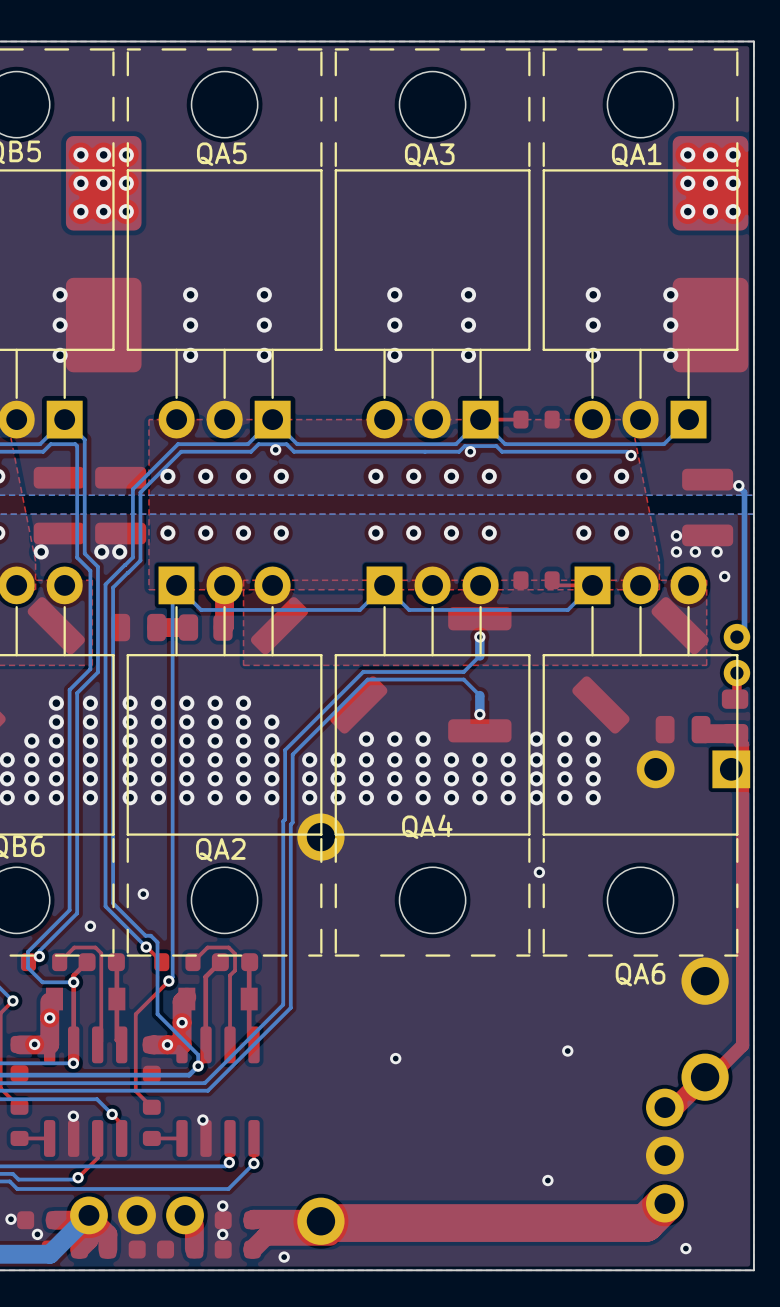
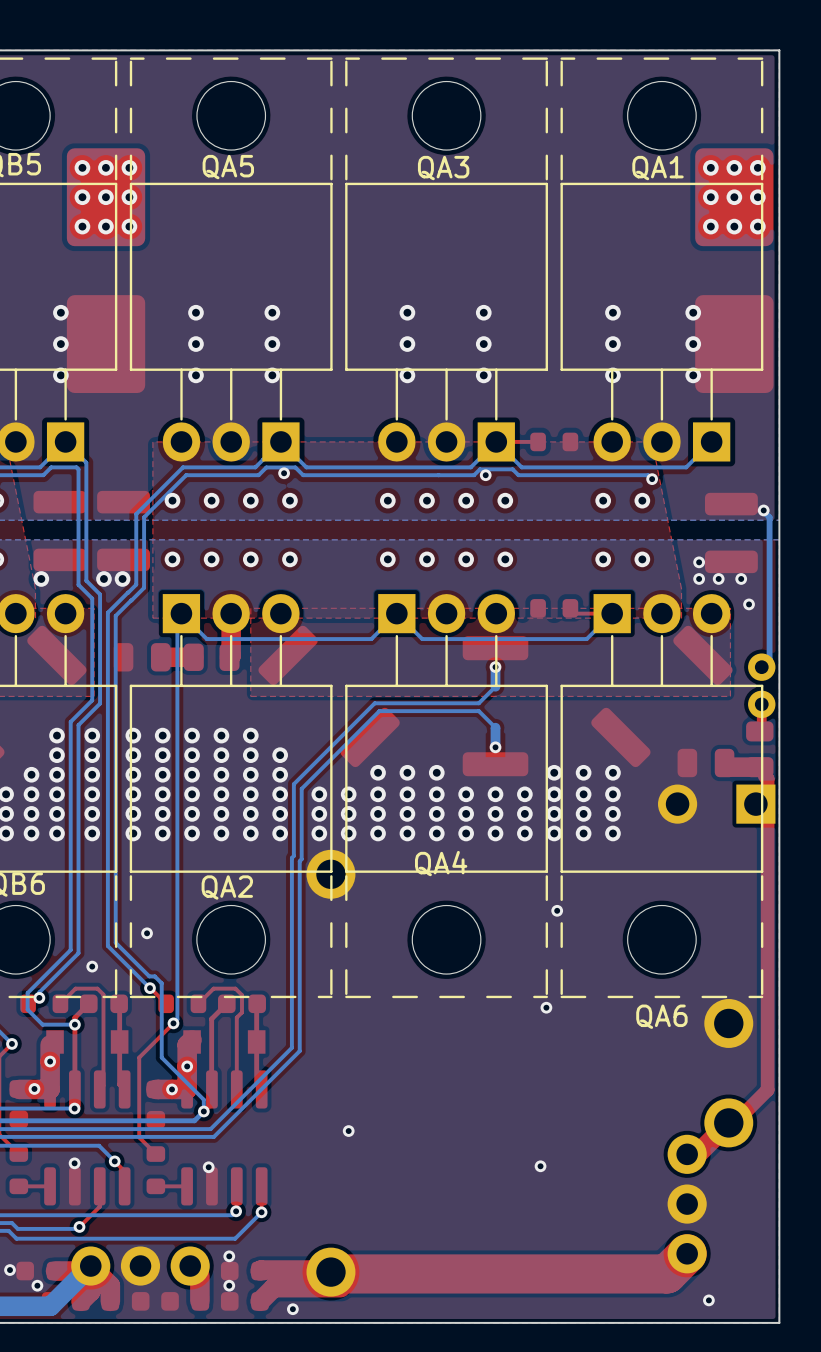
via: none -> (546, 1007)
via: (567, 1051) -> none
via position: (395, 1058) -> (348, 1131)
via: none -> (540, 1166)
via: (547, 1180) -> none

